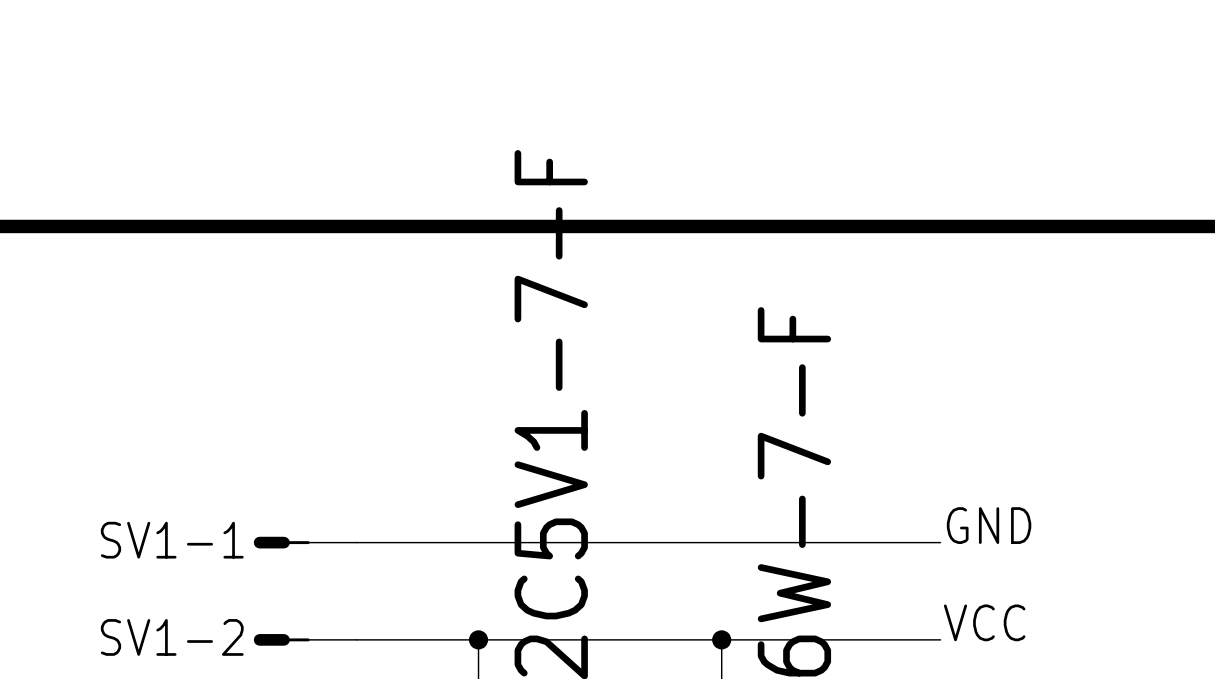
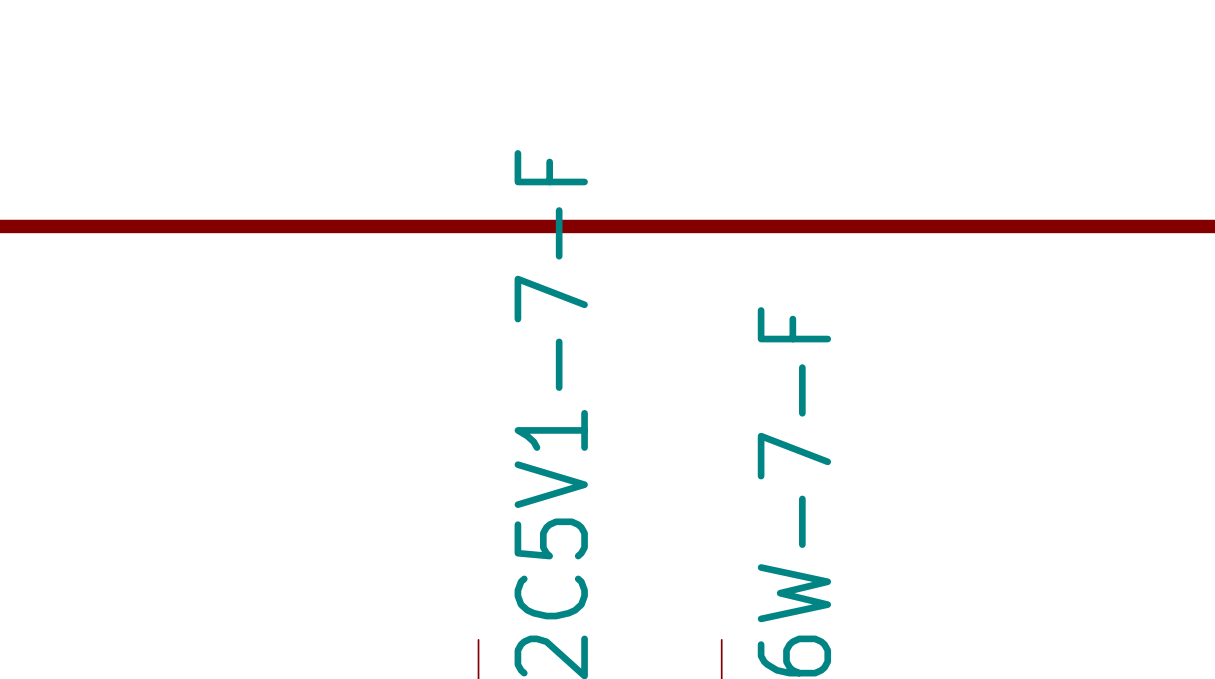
label: GND (989, 525) -> none
SV1-1: (305, 542) -> none
wire: (356, 542) (940, 542) -> none
label: VCC (984, 622) -> none
SV1-2: (305, 639) -> none
wire: (356, 639) (940, 639) -> none
junction: (478, 639) -> none
junction: (721, 639) -> none

